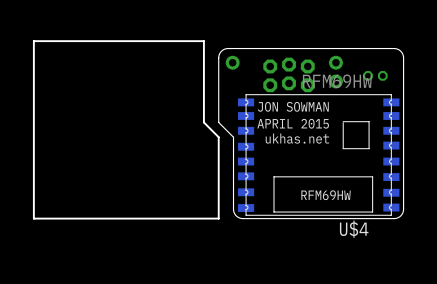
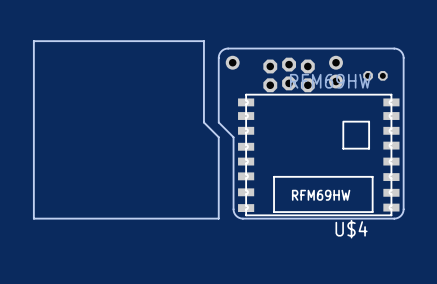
text: JON SOWMAN (293, 106) -> none
text: APRIL 2015 (293, 123) -> none
text: ukhas.net (297, 138) -> none

